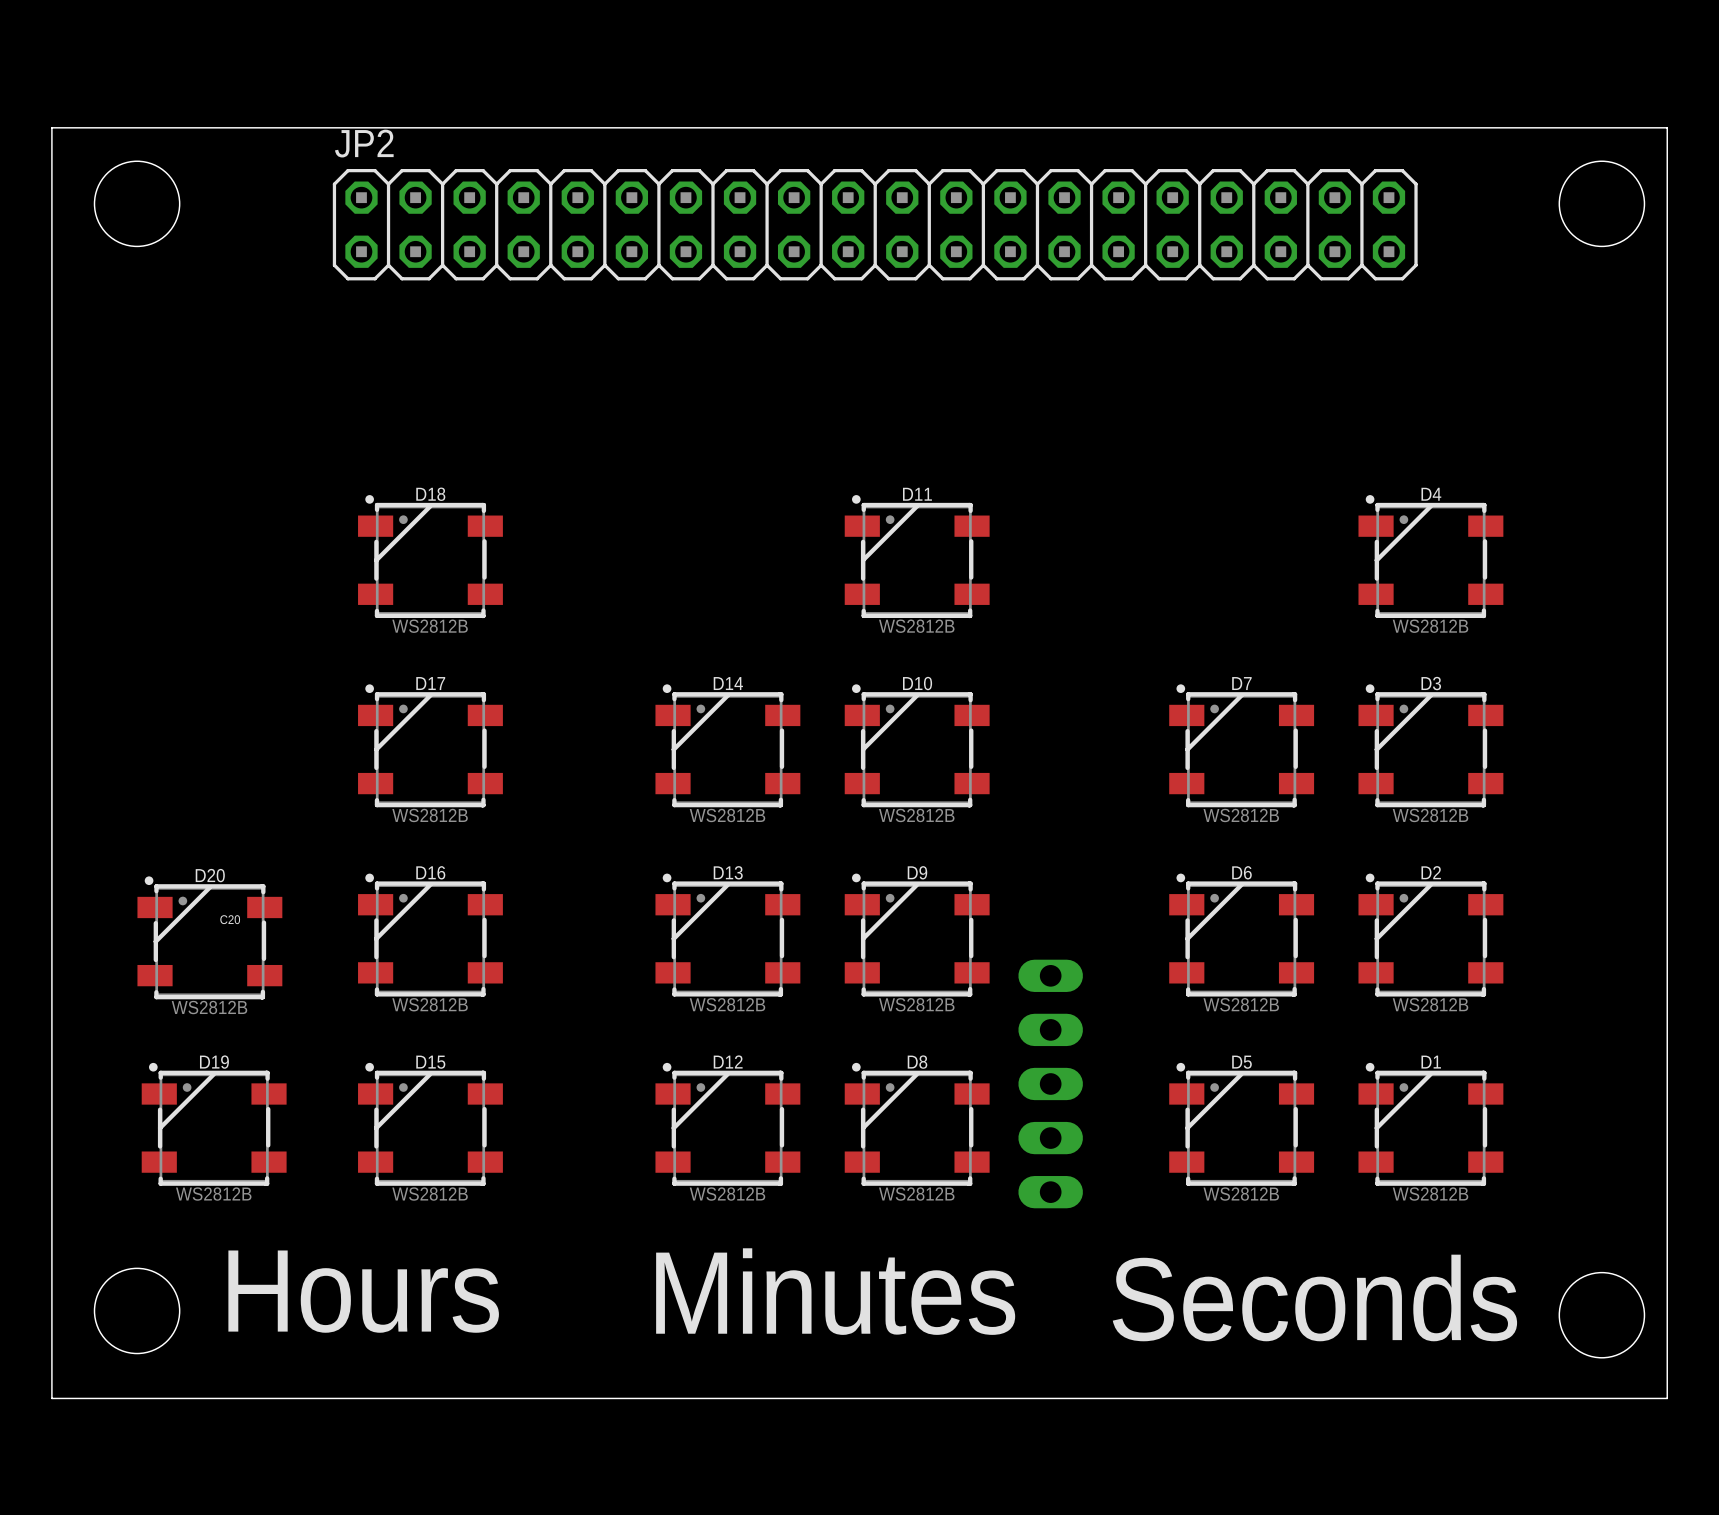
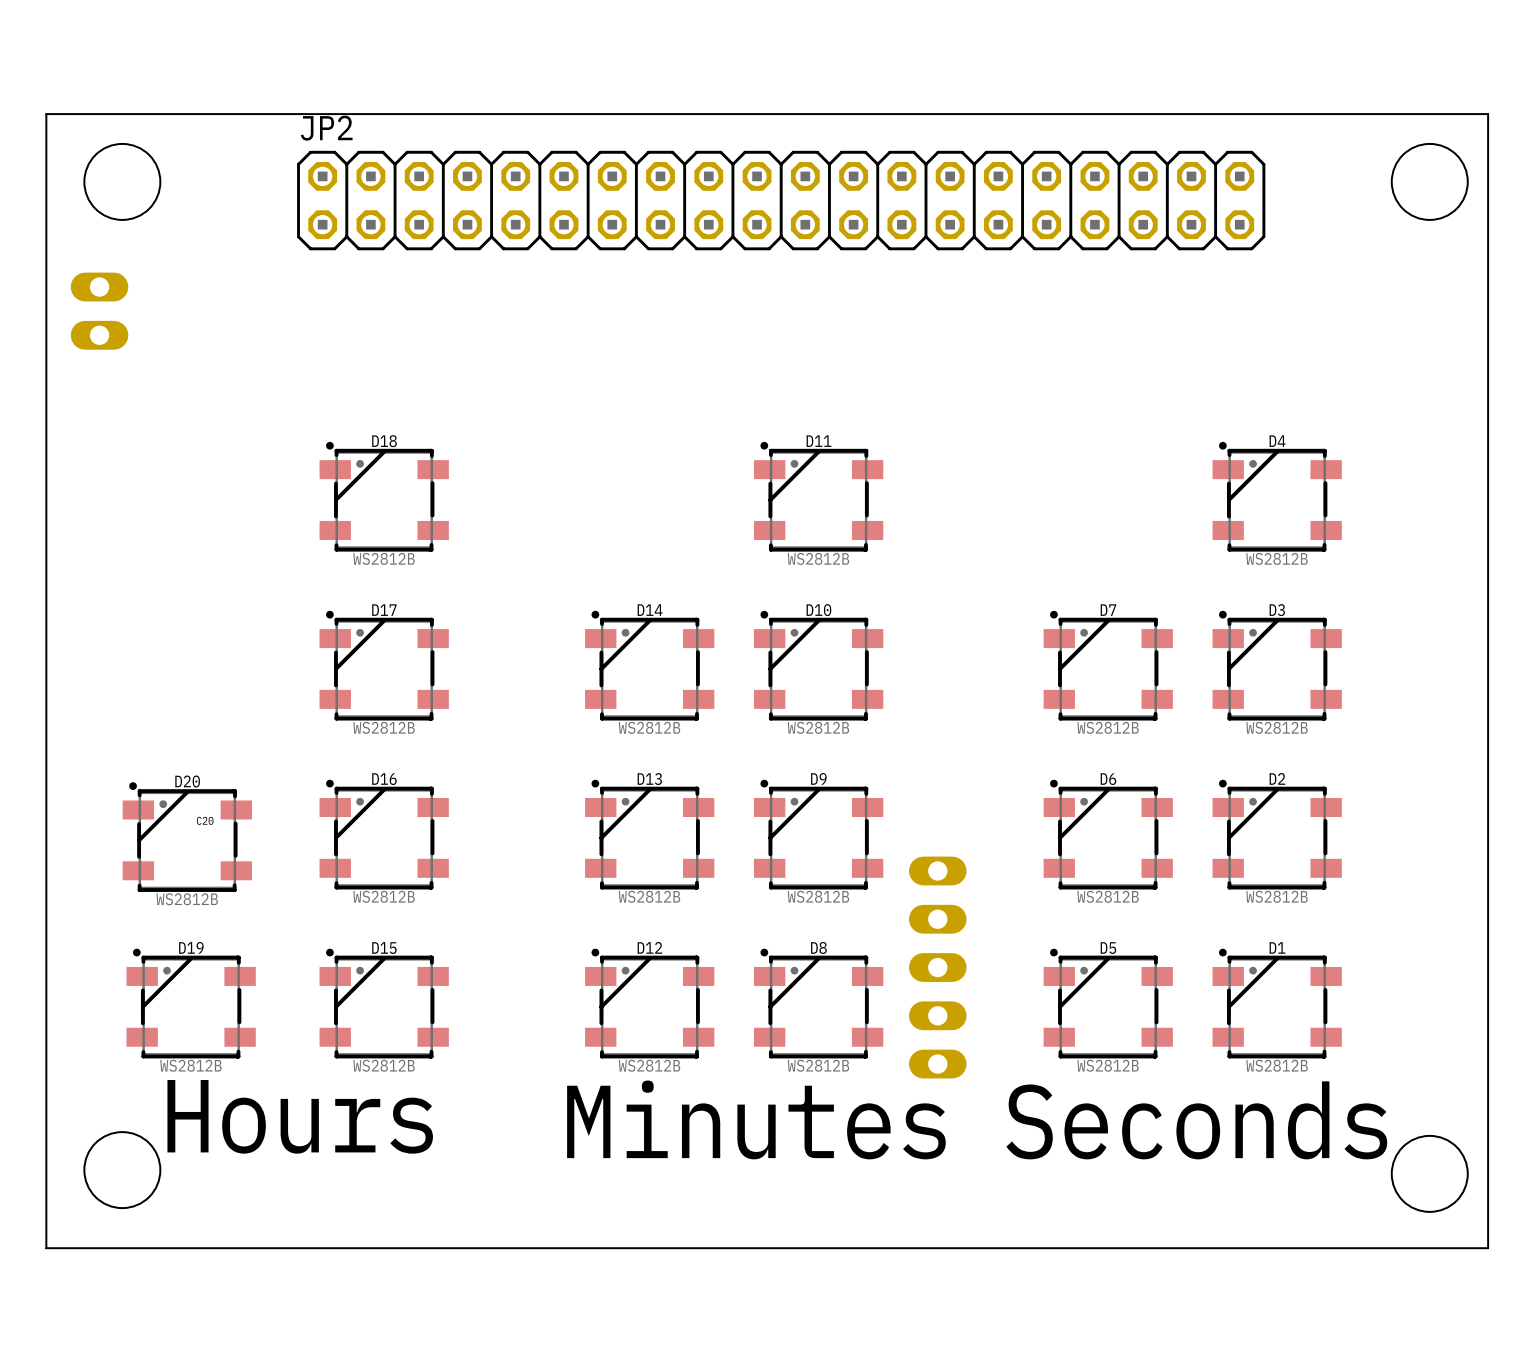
part: none -> (99, 311)
text position: Hours (363, 1291) -> Hours (300, 1116)
text position: Minutes (835, 1291) -> Minutes (756, 1119)
text position: Seconds (1314, 1297) -> Seconds (1196, 1120)

